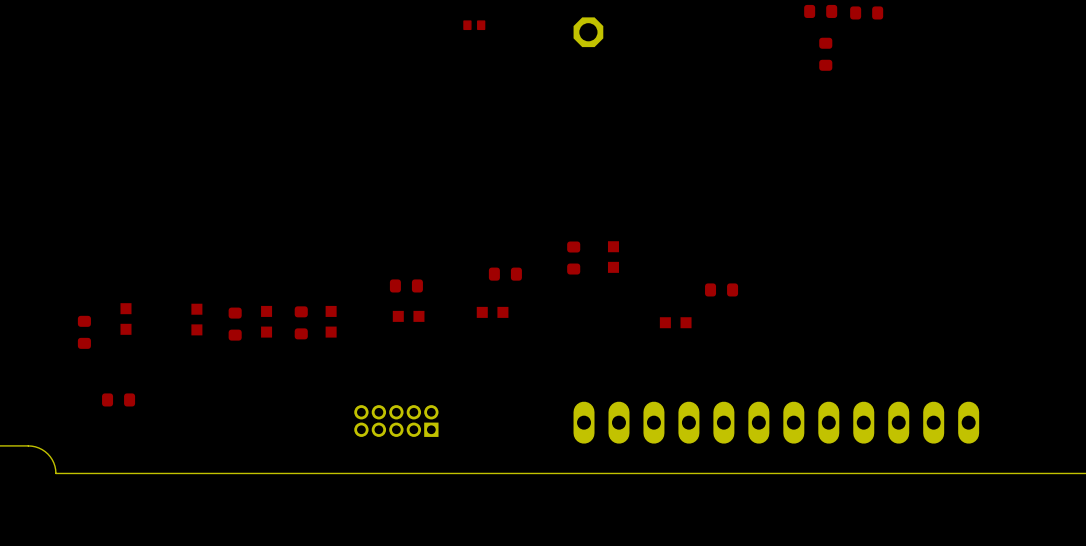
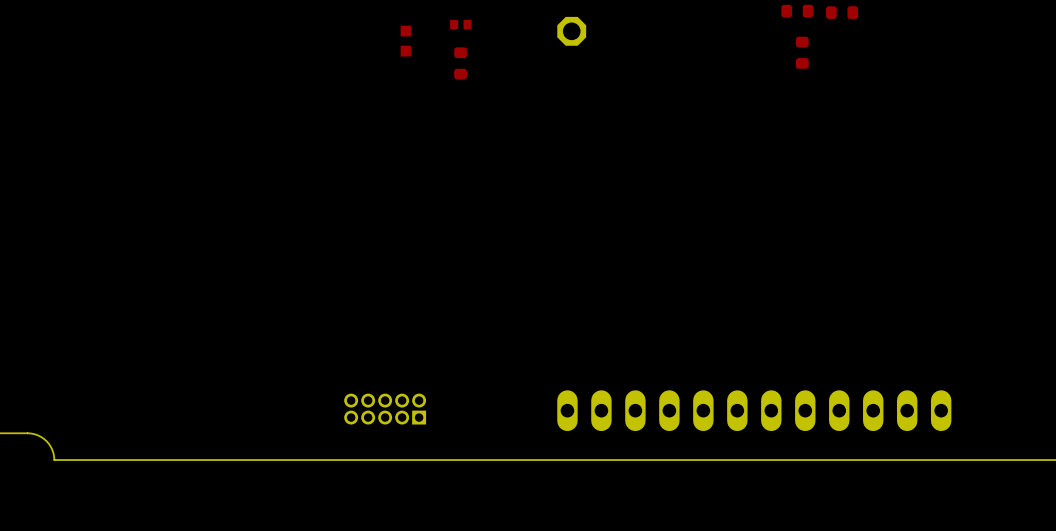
part: none -> (405, 41)
part: none -> (460, 63)
part: (613, 257) -> none
part: (573, 258) -> none
part: (505, 274) -> none
part: (406, 285) -> none
part: (721, 289) -> none
part: (492, 312) -> none
part: (408, 316) -> none
part: (125, 319) -> none
part: (196, 319) -> none
part: (266, 321) -> none
part: (331, 321) -> none
part: (301, 322) -> none
part: (675, 322) -> none
part: (235, 324) -> none
part: (84, 332) -> none
part: (118, 399) -> none

